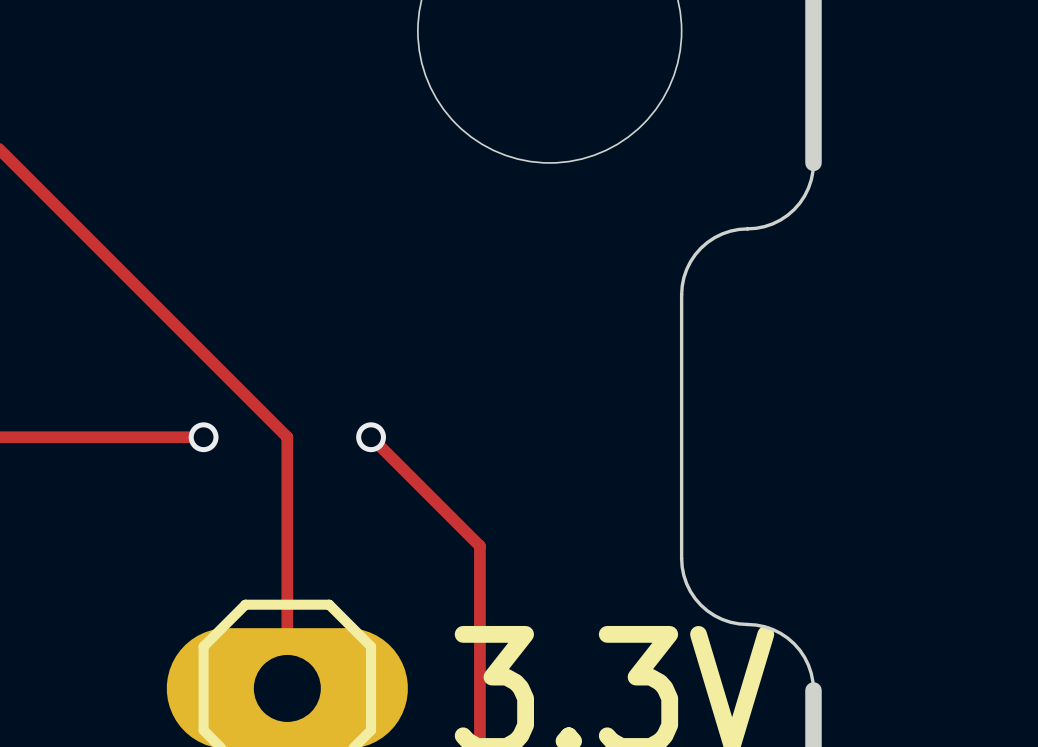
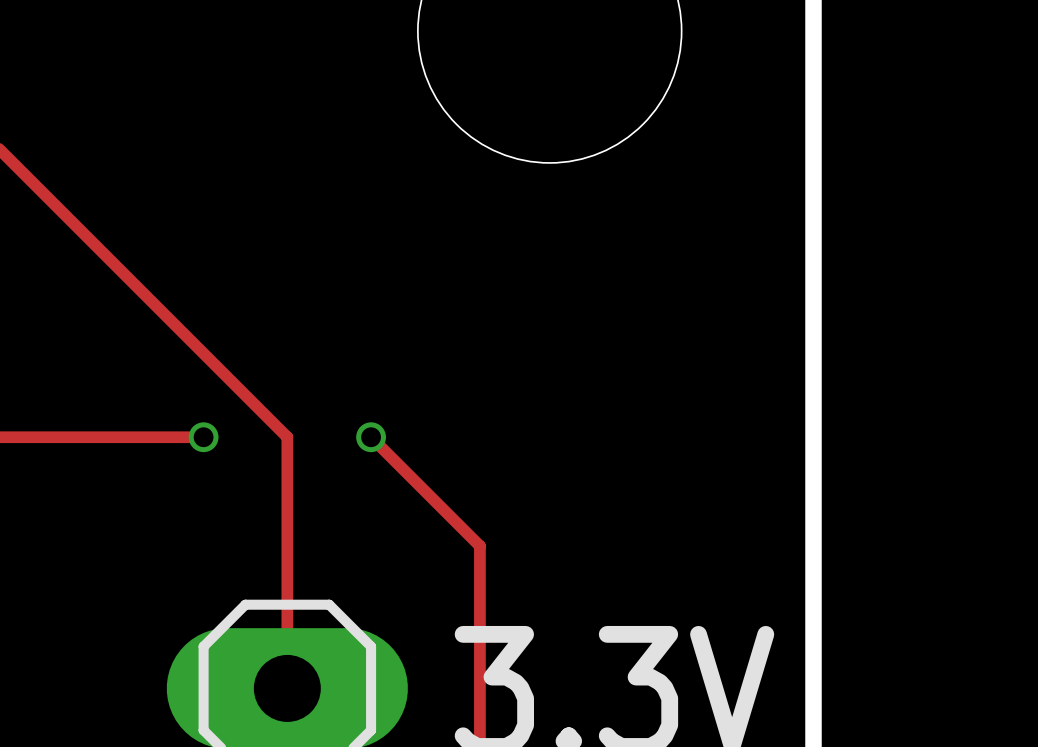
board edge: (813, 162) (808, 188) (794, 209) (772, 223) (756, 228) (730, 231) (707, 242) (695, 254) (686, 269) (681, 294) (681, 558) (683, 575) (695, 598) (714, 615) (730, 622) (756, 625) (772, 629) (794, 643) (808, 665) (813, 690) -> (813, 162) (813, 690)

